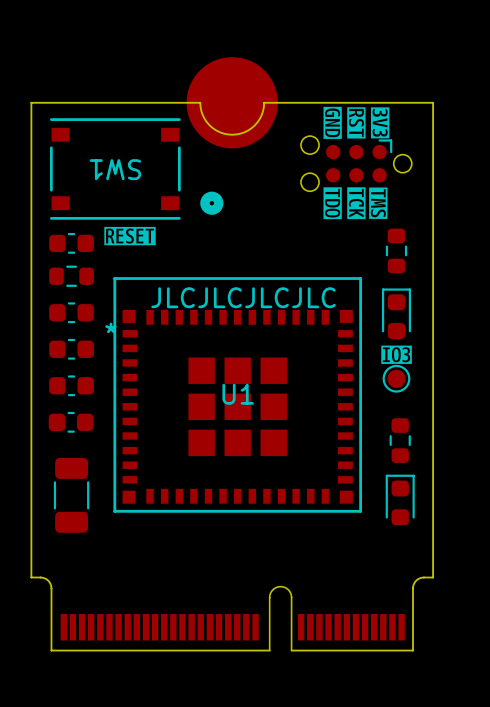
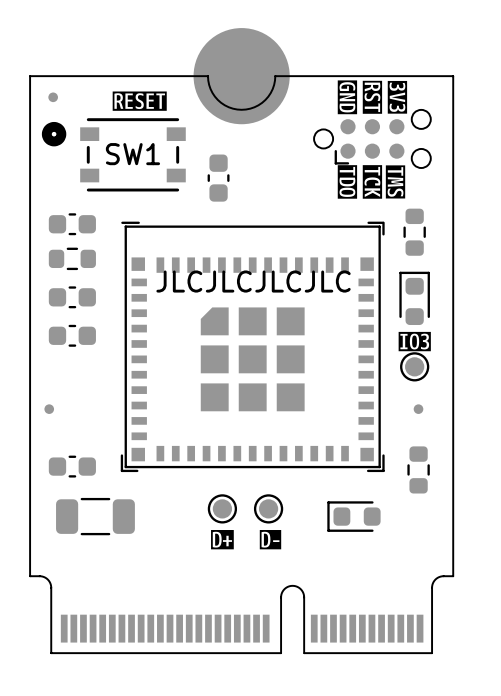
SW1 footprint: [49, 118, 224, 220] -> [41, 118, 186, 192]
part: none -> (53, 97)
part rotation: 0° (356, 163) -> 180° (372, 138)
SW1 name position: SW1 (115, 169) -> SW1 (132, 154)
part: none -> (218, 178)
drawing position: (129, 236) -> (139, 101)
part: none -> (252, 346)
part: (71, 385) -> none
U1: (237, 394) -> none
part: none -> (49, 409)
part: none -> (418, 409)
part: (71, 422) -> none
part position: (400, 440) -> (418, 469)
part: none -> (72, 466)
part rotation: 0° (71, 495) -> 90° clockwise (95, 516)
part rotation: 0° (400, 499) -> 90° counterclockwise (353, 516)
part position: (400, 499) -> (353, 516)
part: none -> (222, 508)
part: none -> (268, 508)
drawing: none -> [211, 530, 234, 550]
drawing: none -> [259, 530, 282, 550]

